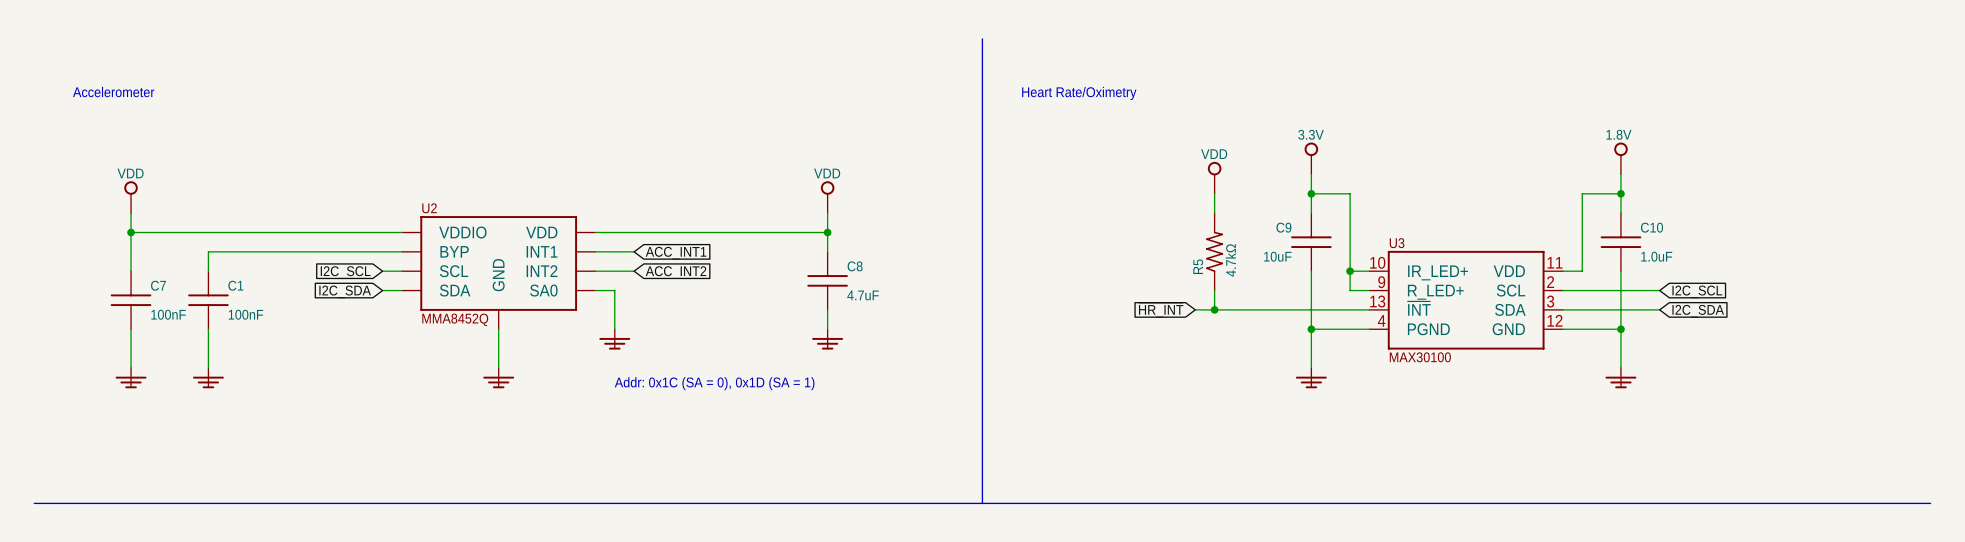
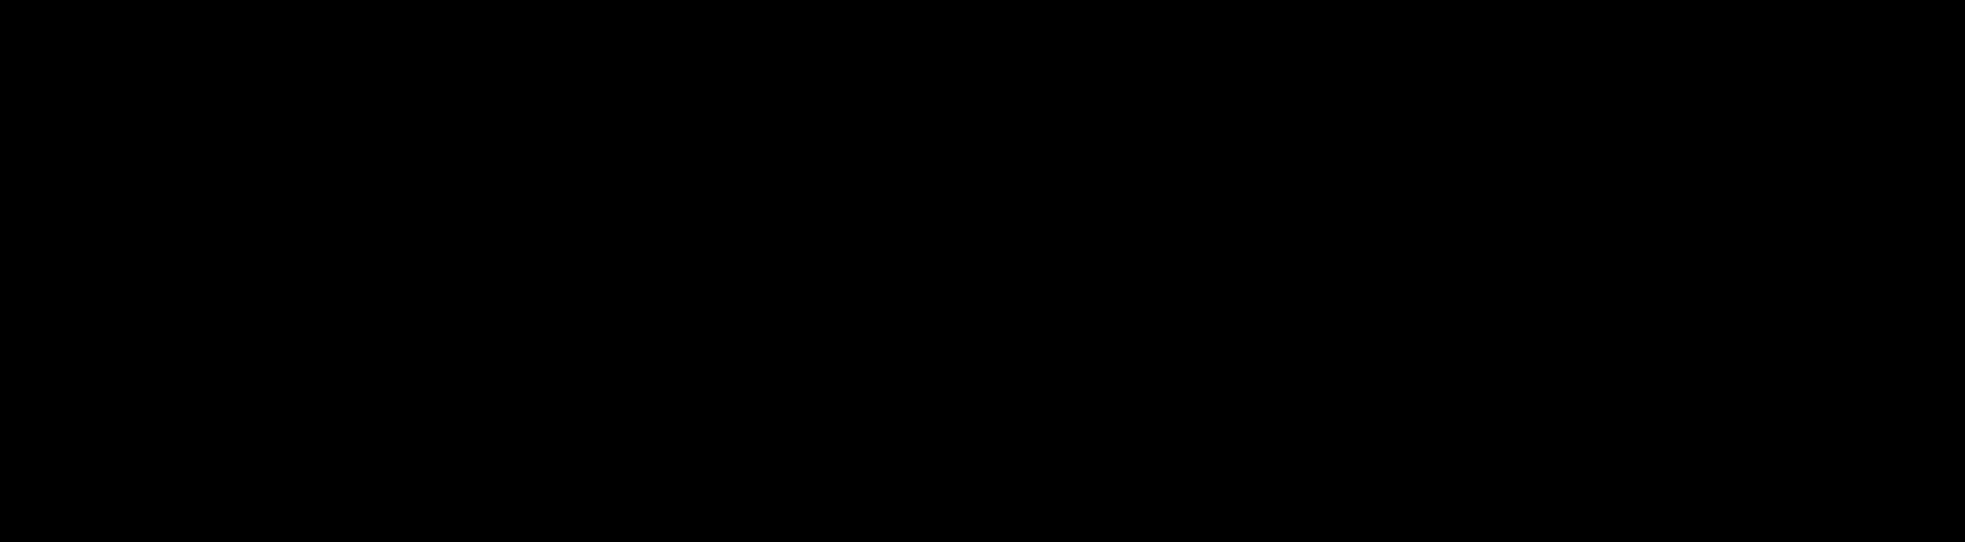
line: (982, 39) (982, 503) -> none
text: Accelerometer (113, 92) -> none
text: Heart Rate/Oximetry (1079, 93) -> none
power symbol: (1311, 158) -> none
power symbol: (1620, 158) -> none
wire: (1311, 174) (1311, 213) -> none
wire: (1620, 174) (1620, 213) -> none
power symbol: (1214, 177) -> none
wire: (1214, 193) (1214, 213) -> none
wire: (1311, 193) (1350, 193) (1350, 290) (1369, 290) -> none
junction: (1311, 193) -> none
wire: (1620, 193) (1582, 193) (1582, 271) (1562, 271) -> none
junction: (1620, 193) -> none
power symbol: (131, 197) -> none
power symbol: (827, 197) -> none
wire: (131, 213) (131, 271) -> none
wire: (827, 213) (827, 251) -> none
wire: (131, 232) (401, 232) -> none
junction: (131, 232) -> none
wire: (595, 232) (827, 232) -> none
junction: (827, 232) -> none
C9: (1311, 242) -> none
C10: (1620, 242) -> none
wire: (401, 251) (208, 251) (208, 271) -> none
wire: (595, 251) (634, 251) -> none
R5: (1214, 251) -> none
global label: ACC_INT1 (676, 253) -> none
wire: (382, 271) (401, 271) -> none
wire: (595, 271) (634, 271) -> none
wire: (1311, 271) (1311, 367) -> none
wire: (1350, 271) (1369, 271) -> none
junction: (1350, 271) -> none
wire: (1620, 271) (1620, 367) -> none
global label: I2C_SCL (345, 272) -> none
U2: MMA8452Q (498, 272) -> none
global label: ACC_INT2 (676, 272) -> none
C8: (827, 280) -> none
wire: (382, 290) (401, 290) -> none
wire: (595, 290) (614, 290) (614, 329) -> none
wire: (1214, 290) (1214, 309) -> none
wire: (1562, 290) (1659, 290) -> none
global label: I2C_SDA (345, 291) -> none
global label: I2C_SCL (1697, 291) -> none
C7: (131, 300) -> none
C1: (208, 300) -> none
U3: MAX30100 (1466, 300) -> none
wire: (827, 309) (827, 329) -> none
wire: (1195, 309) (1369, 309) -> none
junction: (1214, 309) -> none
wire: (1562, 309) (1659, 309) -> none
global label: ~{HR_INT} (1161, 310) -> none
global label: I2C_SDA (1698, 311) -> none
wire: (131, 329) (131, 367) -> none
wire: (208, 329) (208, 367) -> none
wire: (498, 329) (498, 367) -> none
wire: (1311, 329) (1369, 329) -> none
junction: (1311, 329) -> none
wire: (1562, 329) (1620, 329) -> none
junction: (1620, 329) -> none
power symbol: (614, 339) -> none
power symbol: (827, 339) -> none
power symbol: (131, 378) -> none
power symbol: (208, 378) -> none
power symbol: (498, 378) -> none
power symbol: (1311, 378) -> none
power symbol: (1620, 378) -> none
text: Addr: 0x1C (SA = 0), 0x1D (SA = 1) (714, 383) -> none
line: (34, 503) (1930, 503) -> none

